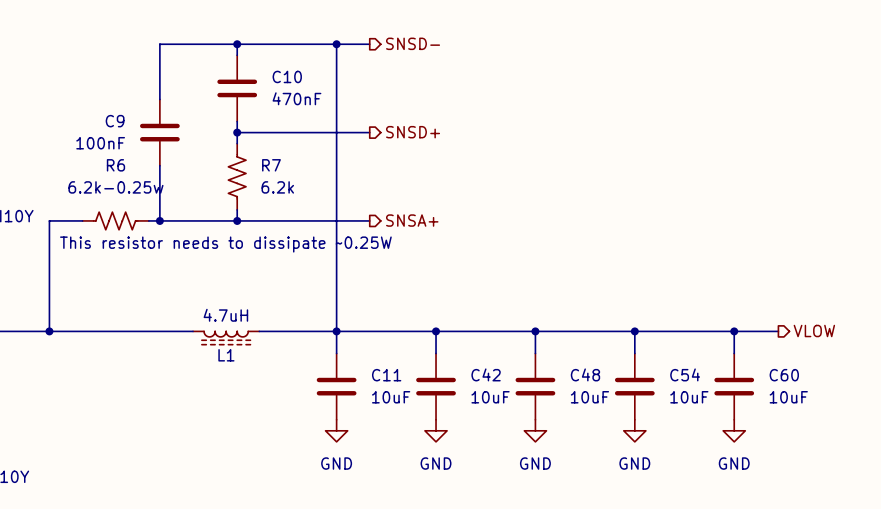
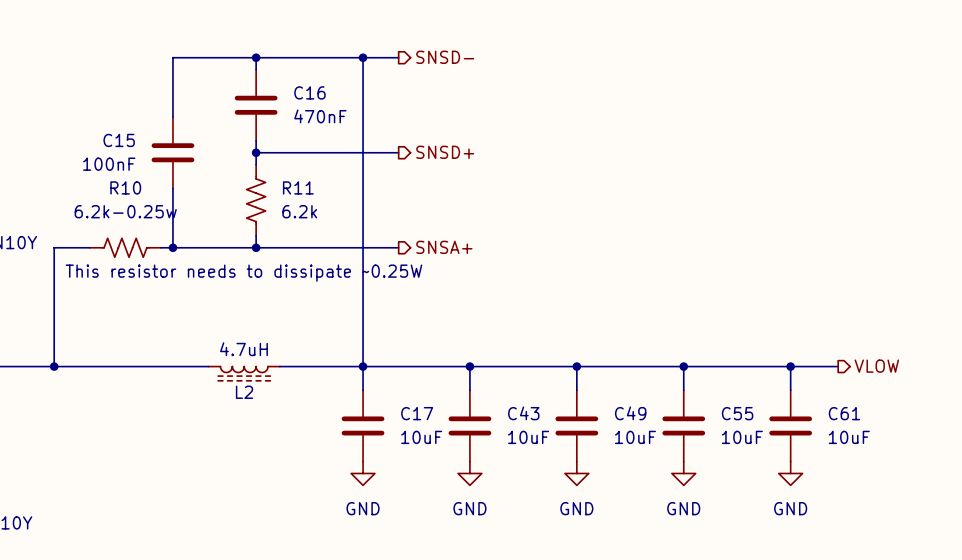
C10 name: C10 (287, 76) -> C16 (309, 92)
C9 name: C9 (115, 121) -> C15 (119, 140)
R6 name: R6 (115, 165) -> R10 (125, 187)
R7 name: R7 (271, 165) -> R11 (298, 187)
L1 name: L1 (226, 355) -> L2 (244, 392)
C42 name: C42 (486, 374) -> C43 (523, 413)
C48 name: C48 (585, 374) -> C49 (630, 413)
C54 name: C54 (685, 374) -> C55 (737, 413)
C11 name: C11 (386, 375) -> C17 (417, 413)
C60 name: C60 (784, 375) -> C61 (844, 413)

